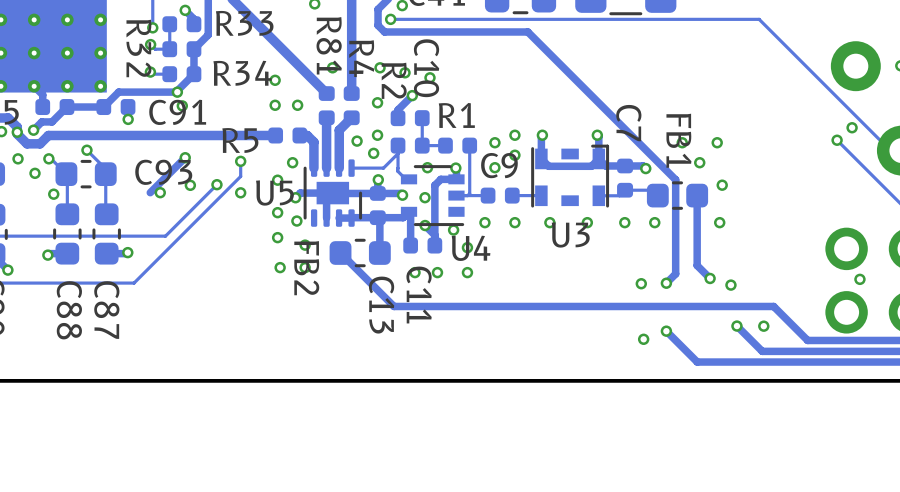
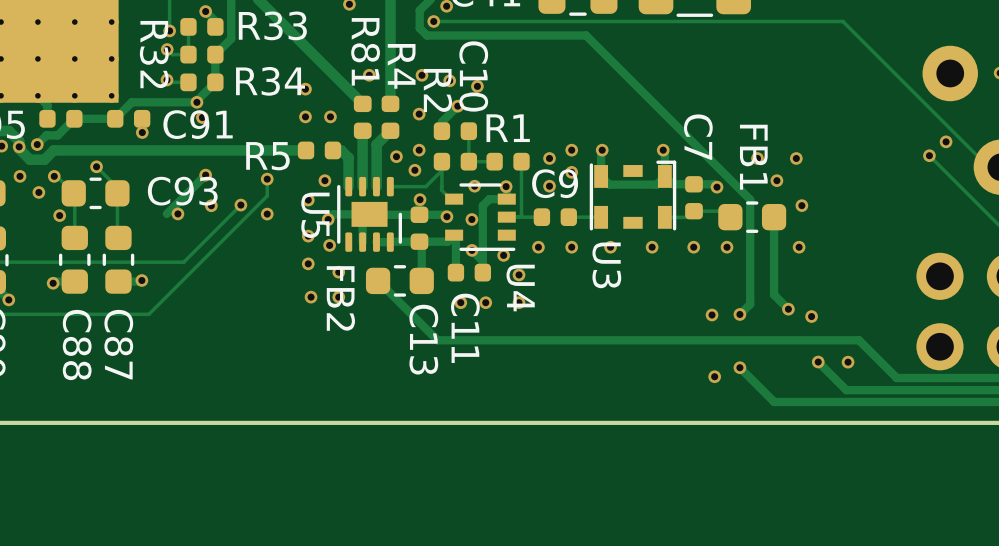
U5 name rotation: 0° (274, 193) -> 90° clockwise (315, 215)
U3 name rotation: 0° (570, 234) -> 90° clockwise (606, 265)
U4 name rotation: 0° (471, 248) -> 90° clockwise (520, 288)
via: (859, 279) -> none

